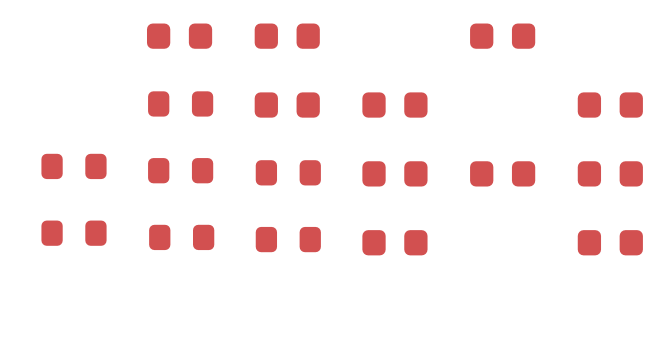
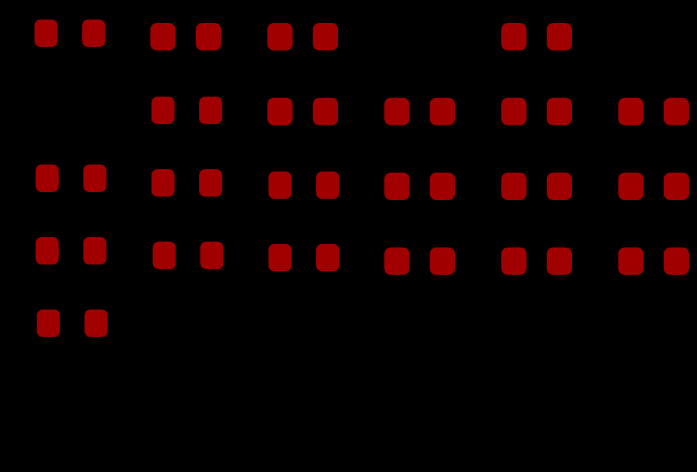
part: none -> (69, 33)
part: none -> (536, 111)
part: none -> (536, 261)
part: none -> (72, 323)

